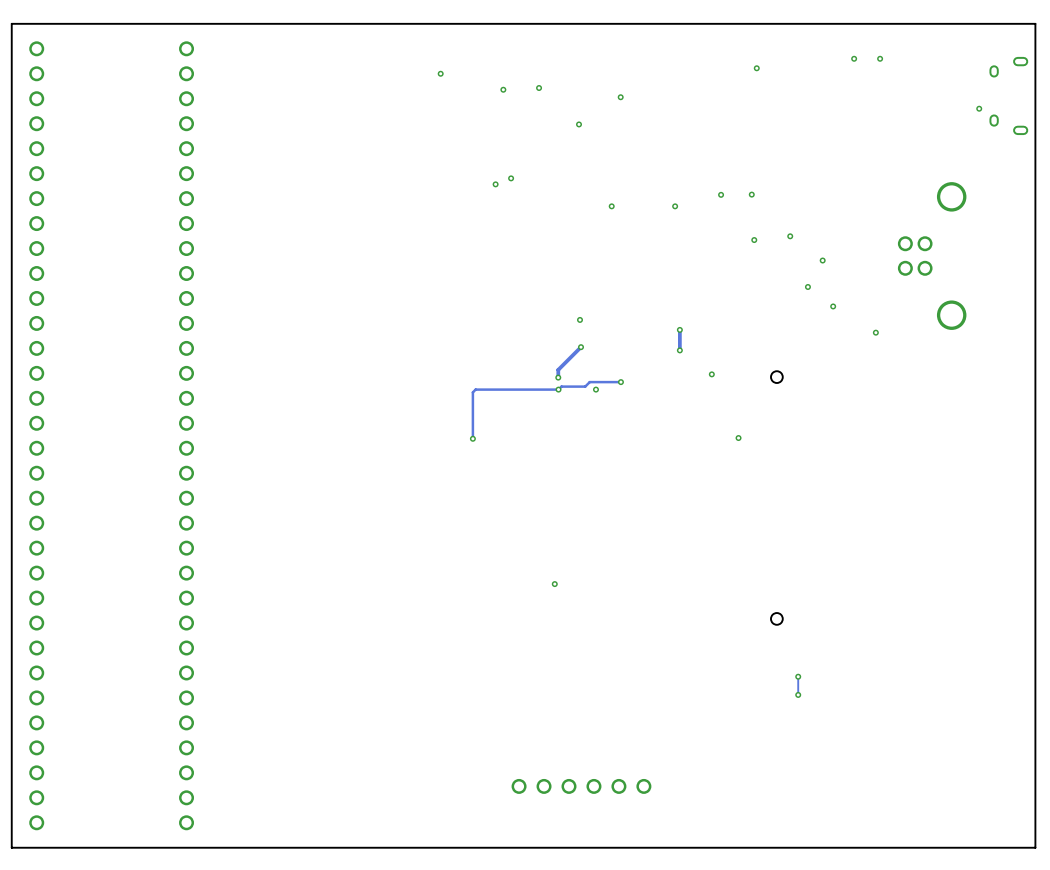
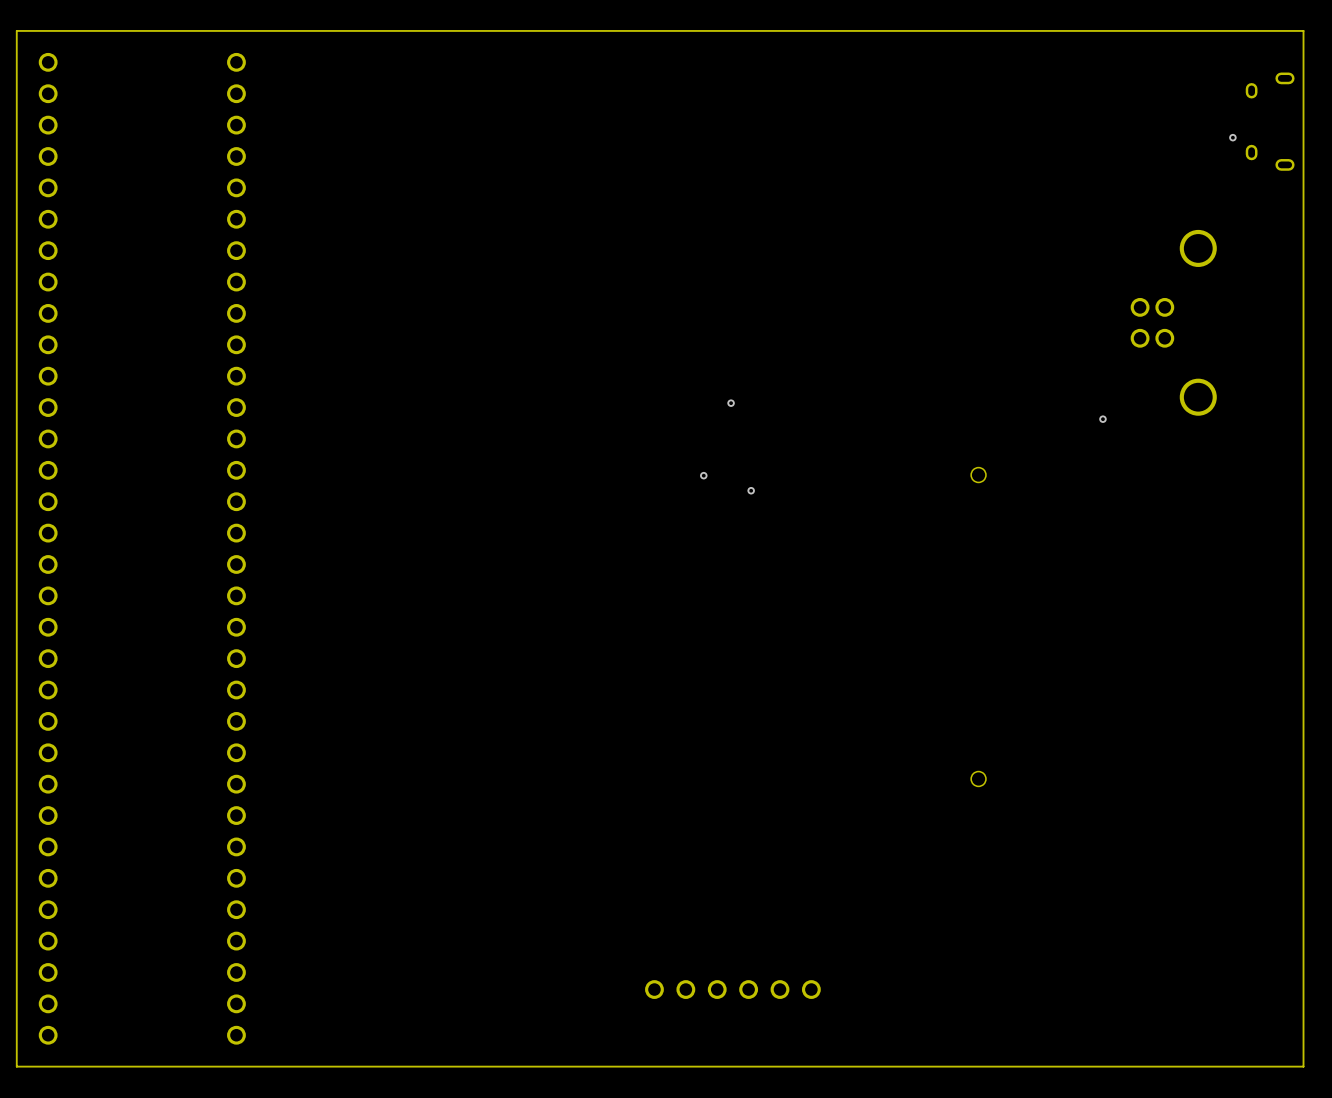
via: (854, 58) -> none
via: (880, 58) -> none
via: (756, 68) -> none
via: (440, 73) -> none
via: (539, 88) -> none
via: (503, 89) -> none
via: (620, 97) -> none
via: (579, 124) -> none
via: (511, 178) -> none
via: (495, 184) -> none
via: (721, 194) -> none
via: (751, 194) -> none
via: (611, 206) -> none
via: (675, 206) -> none
via: (790, 236) -> none
via: (754, 240) -> none
via: (822, 260) -> none
via: (807, 286) -> none
via: (833, 306) -> none
track: (679, 329) (679, 350) -> none
via: (679, 329) -> none
track: (581, 347) (558, 369) (558, 377) -> none
via: (581, 347) -> none
via: (679, 350) -> none
via: (711, 374) -> none
track: (620, 382) (589, 382) (585, 386) (561, 386) (558, 389) (475, 389) (472, 392) (472, 438) -> none
via: (620, 382) -> none
via: (558, 389) -> none
via: (472, 438) -> none
via: (738, 438) -> none
via: (554, 584) -> none
track: (798, 676) (798, 694) -> none
via: (798, 676) -> none
via: (798, 694) -> none

